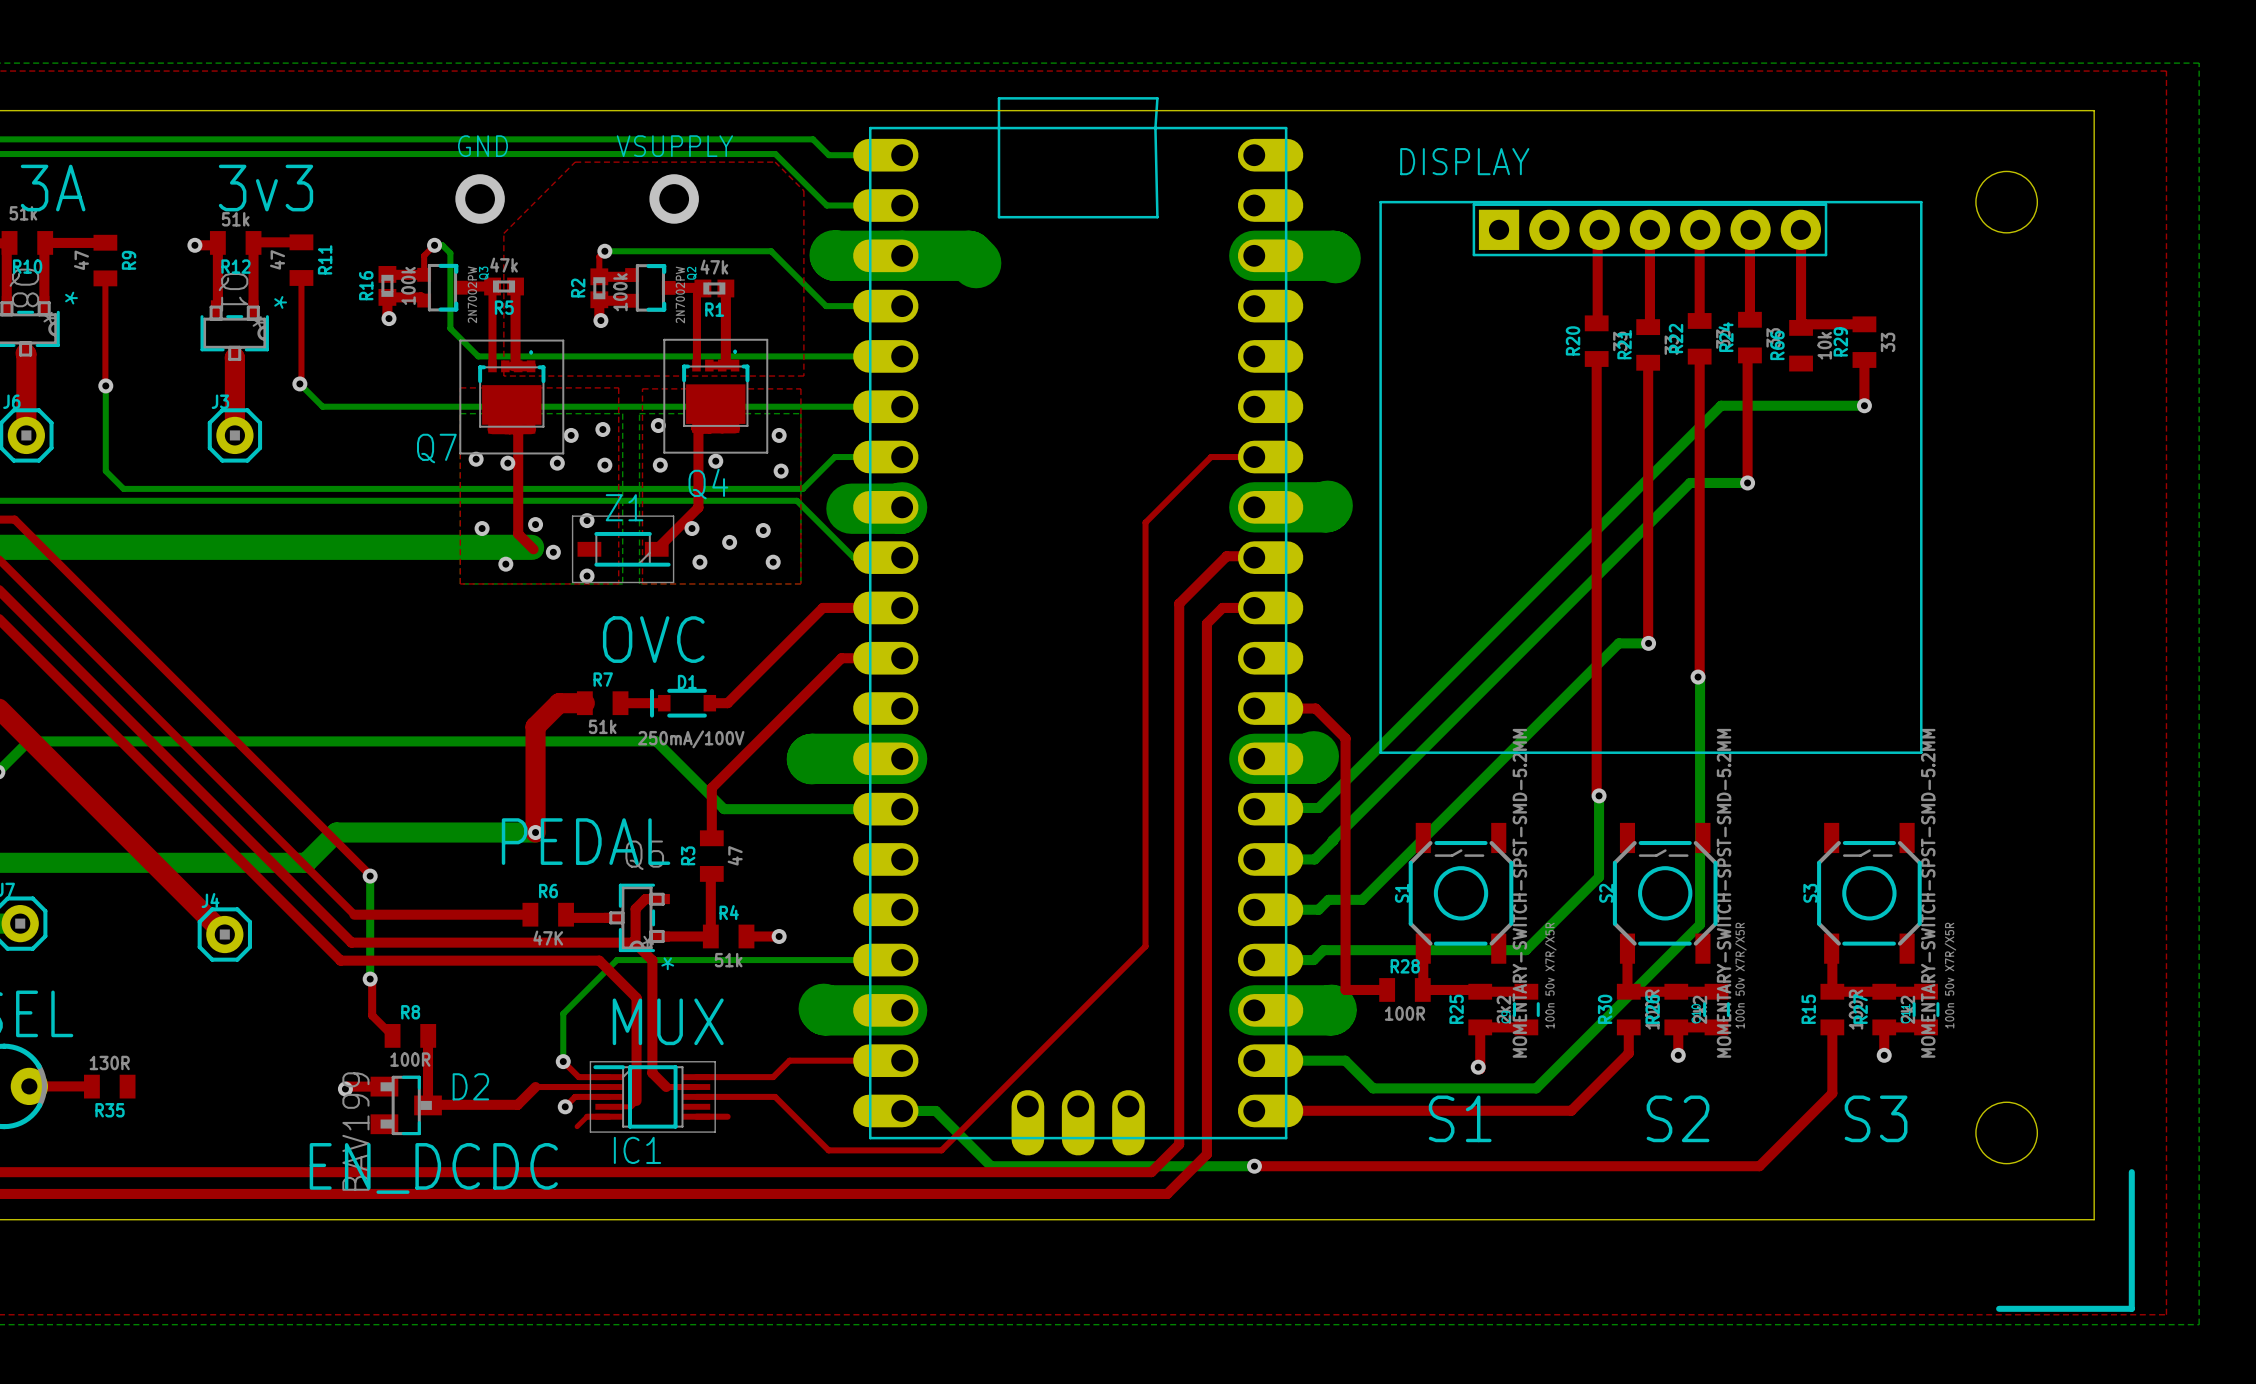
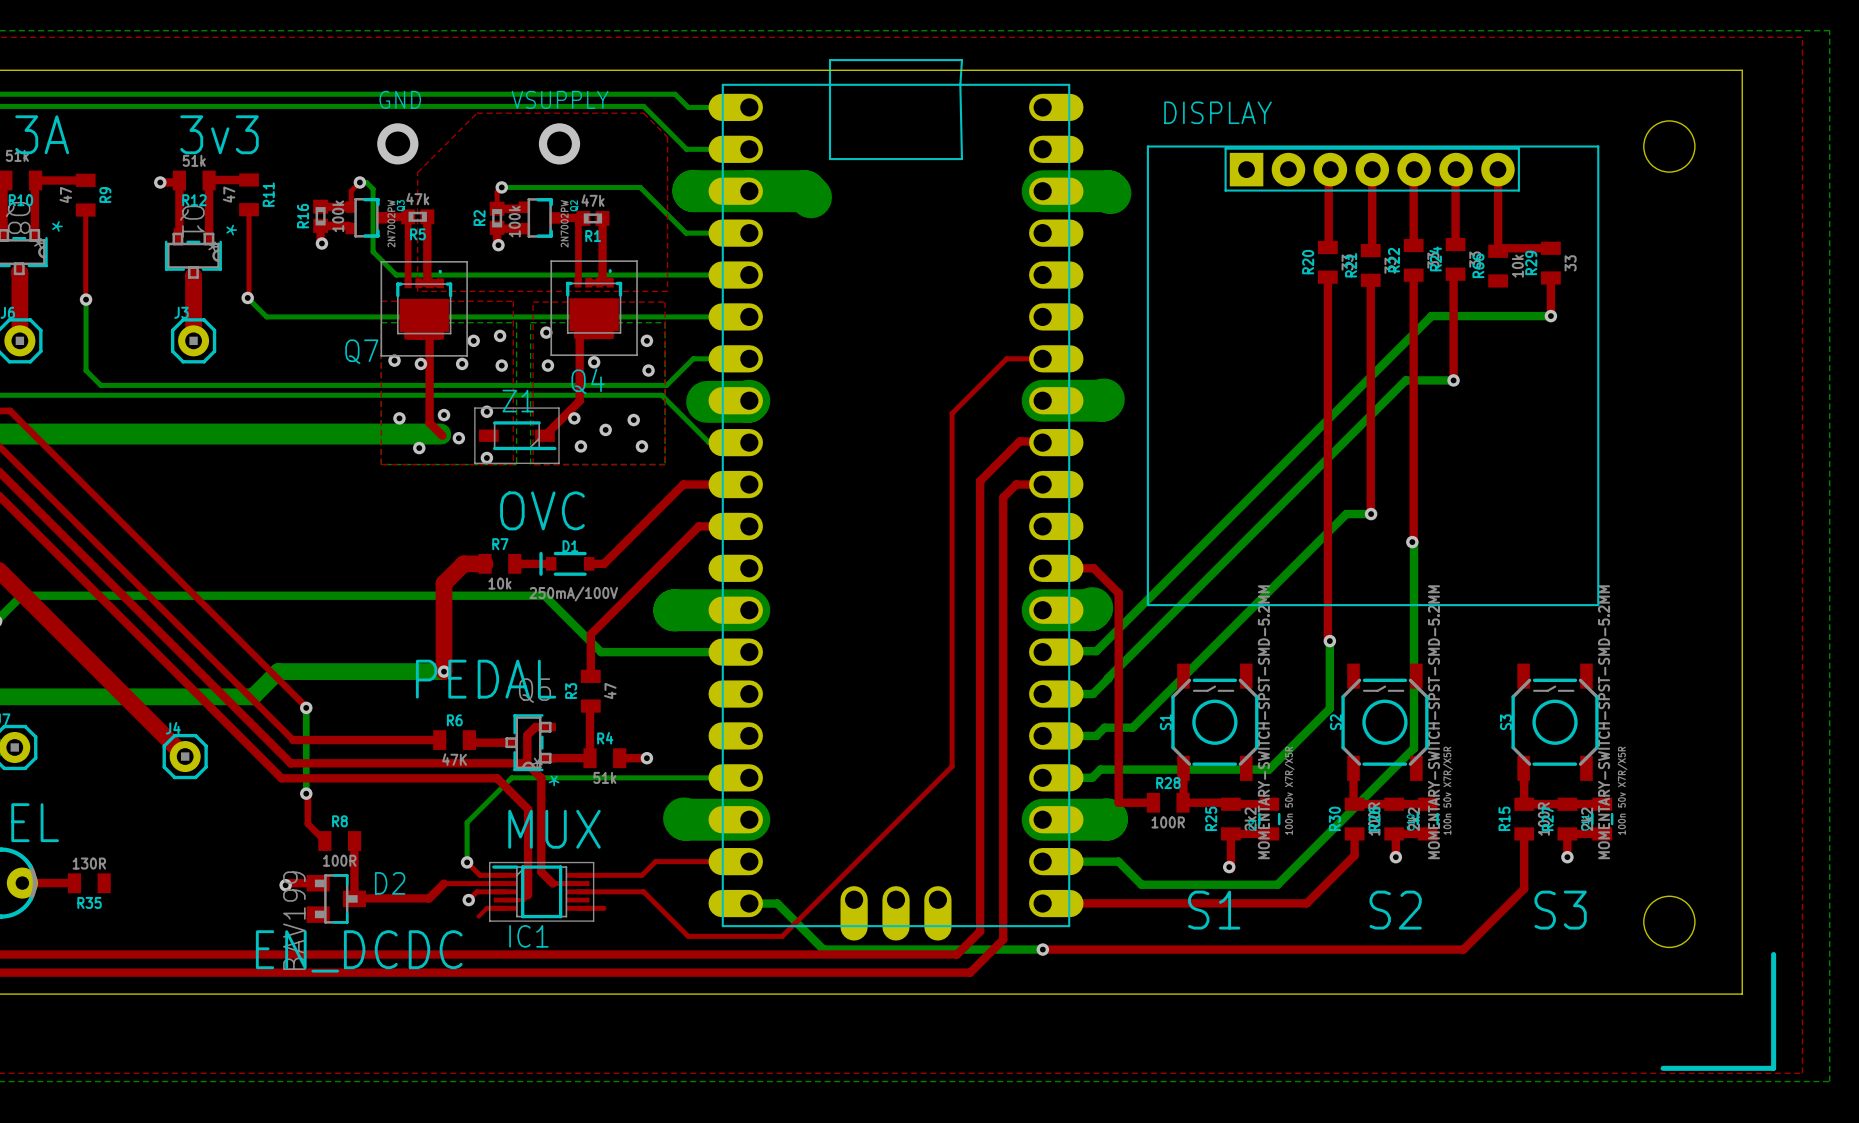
R7 value: 51k (602, 726) -> 10k (499, 583)

